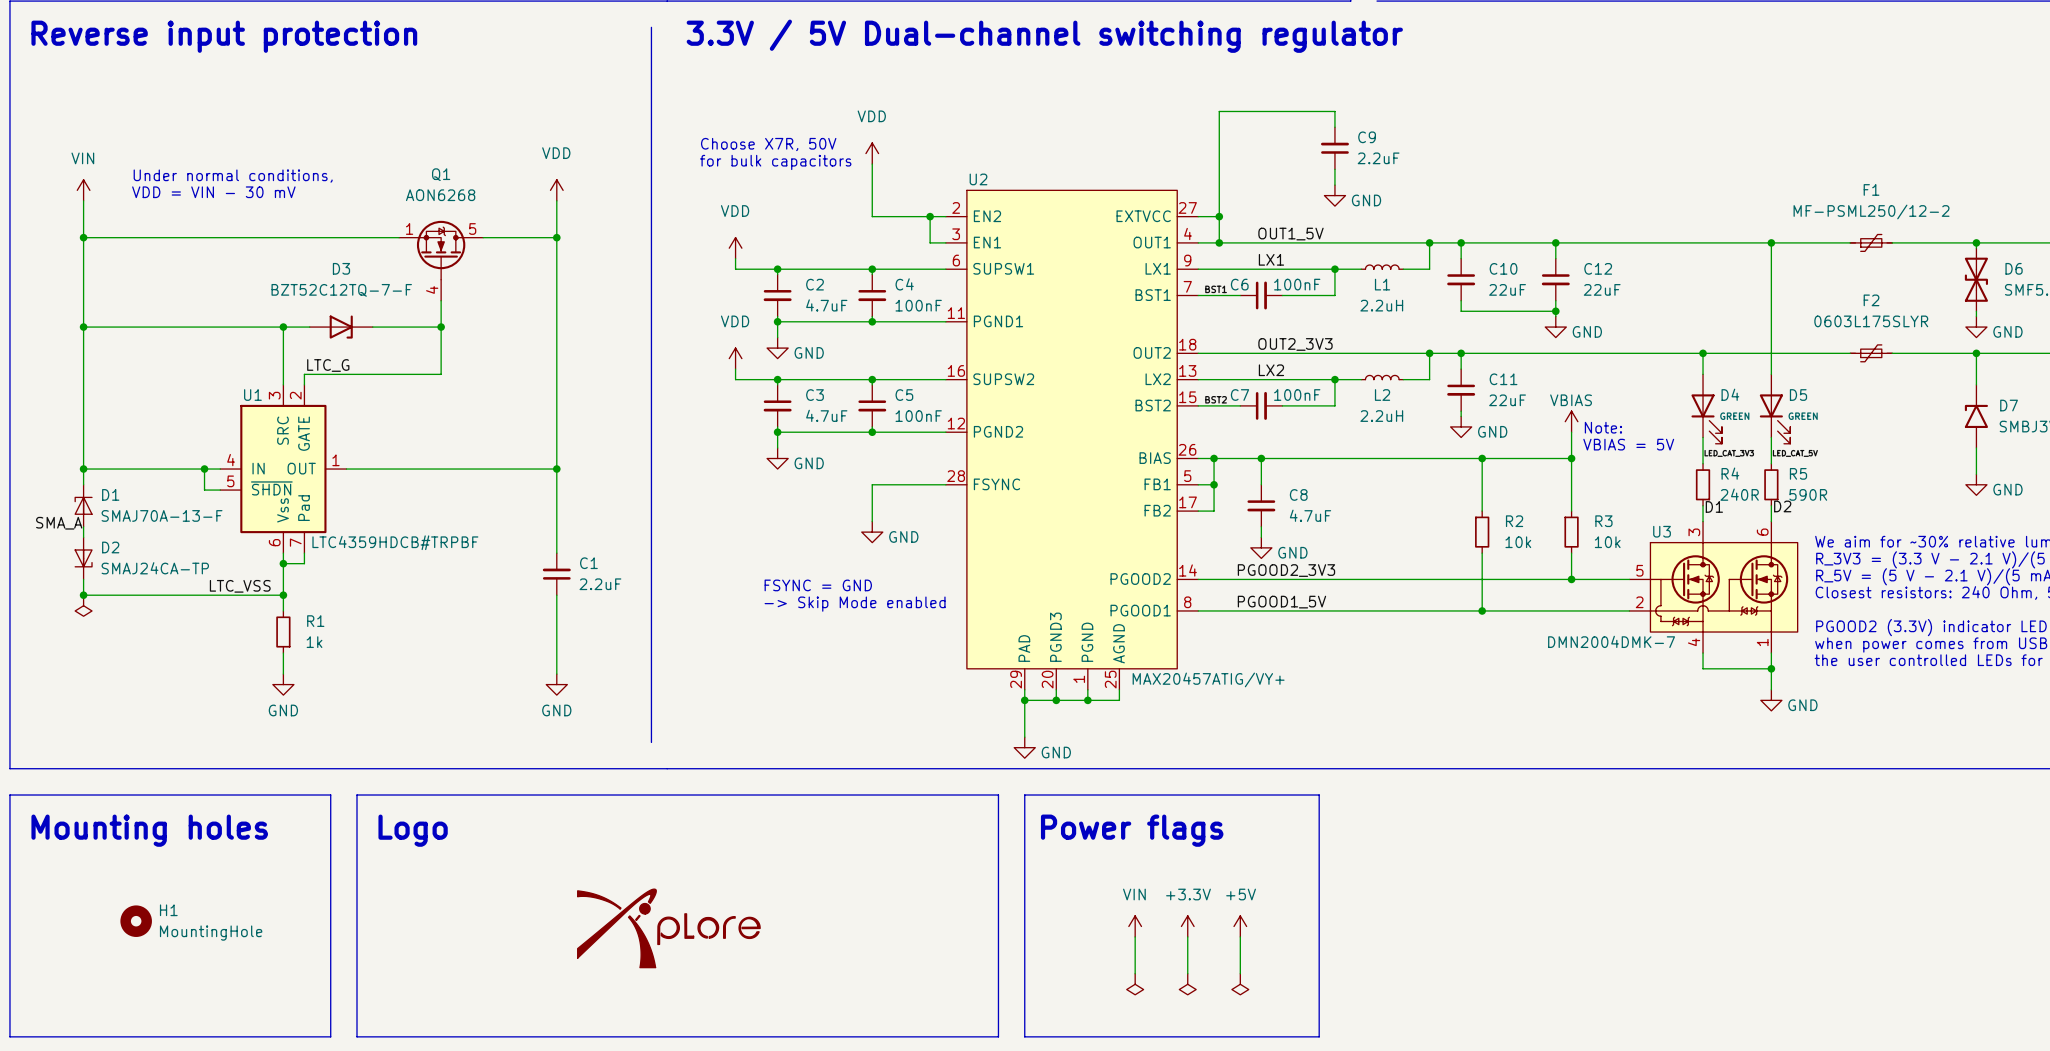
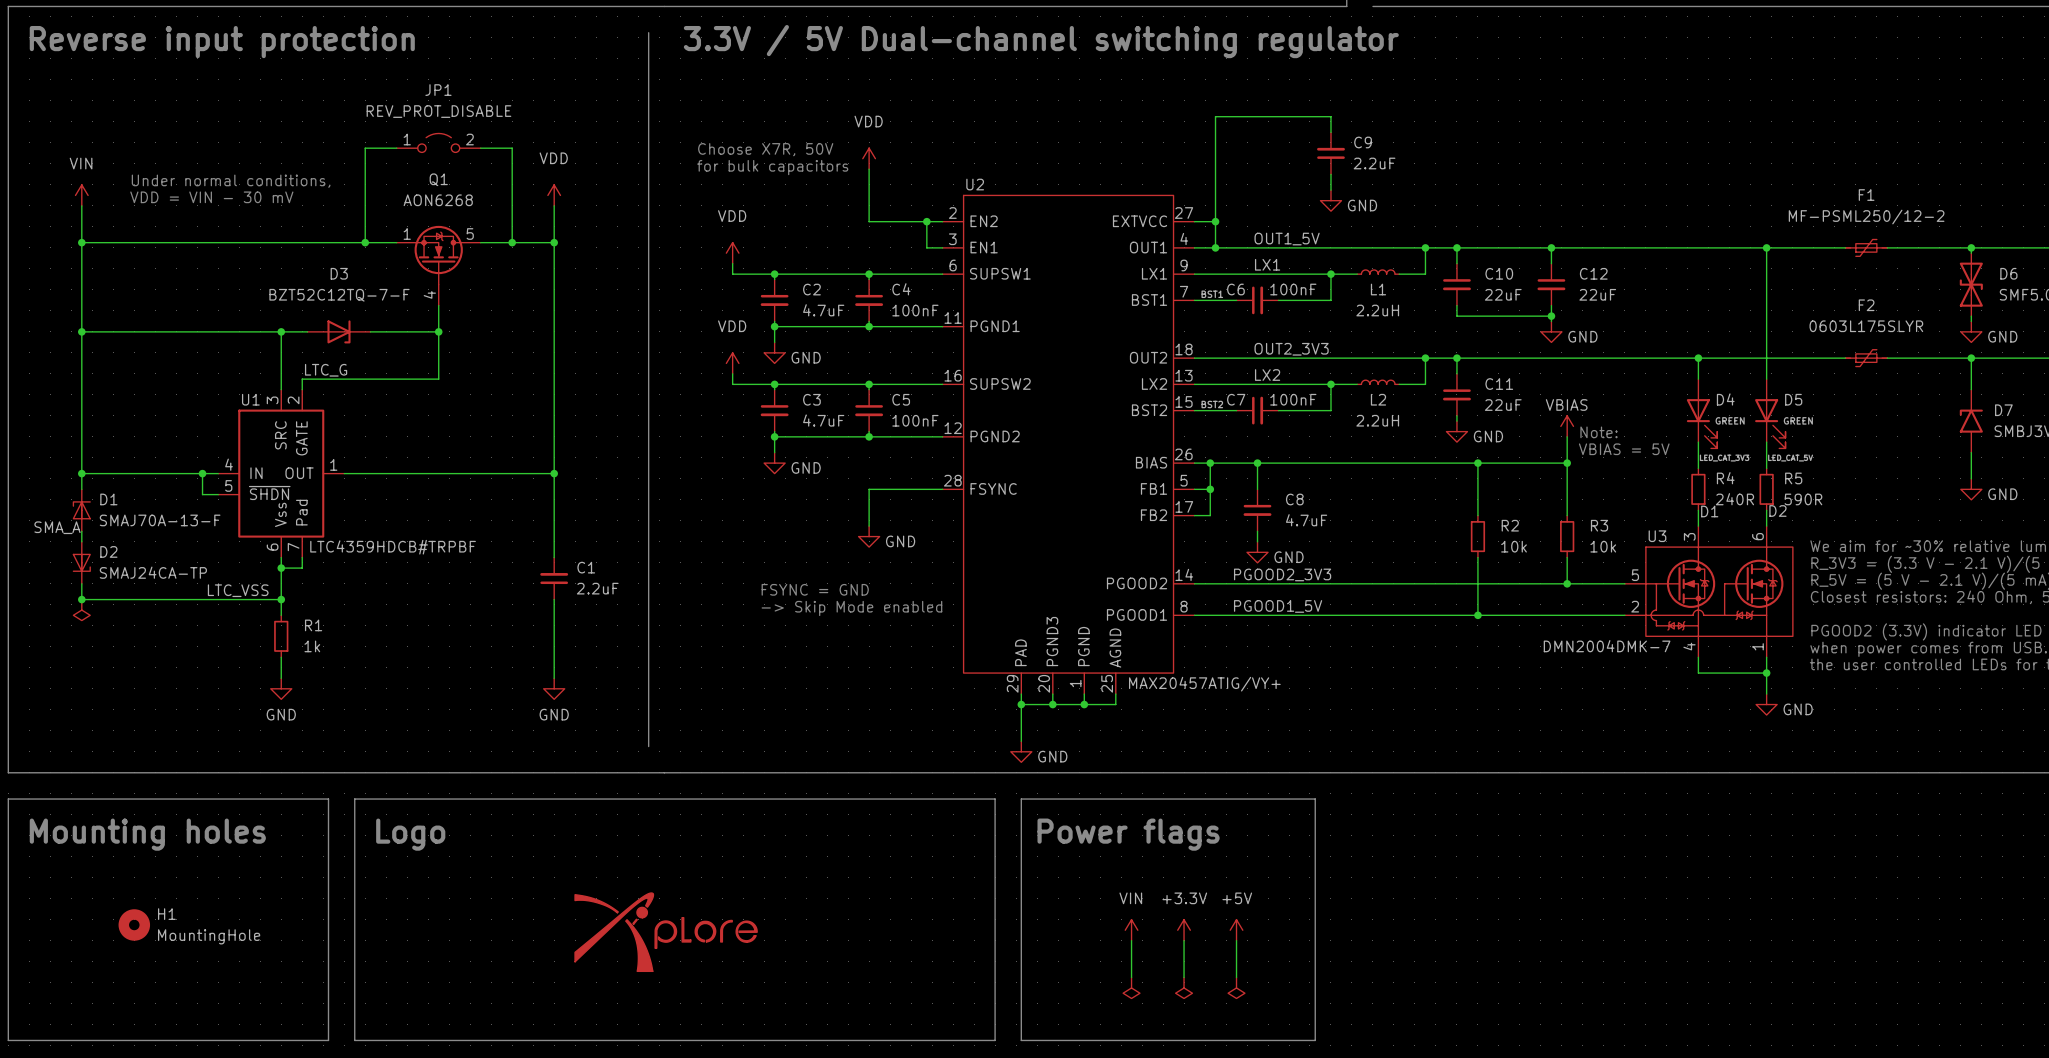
JP1: none -> REV_PROT_DISABLE (438, 142)
wire: none -> (396, 148) (365, 148) (365, 242)
wire: none -> (480, 148) (512, 148) (512, 242)
junction: none -> (365, 242)
junction: none -> (512, 242)

